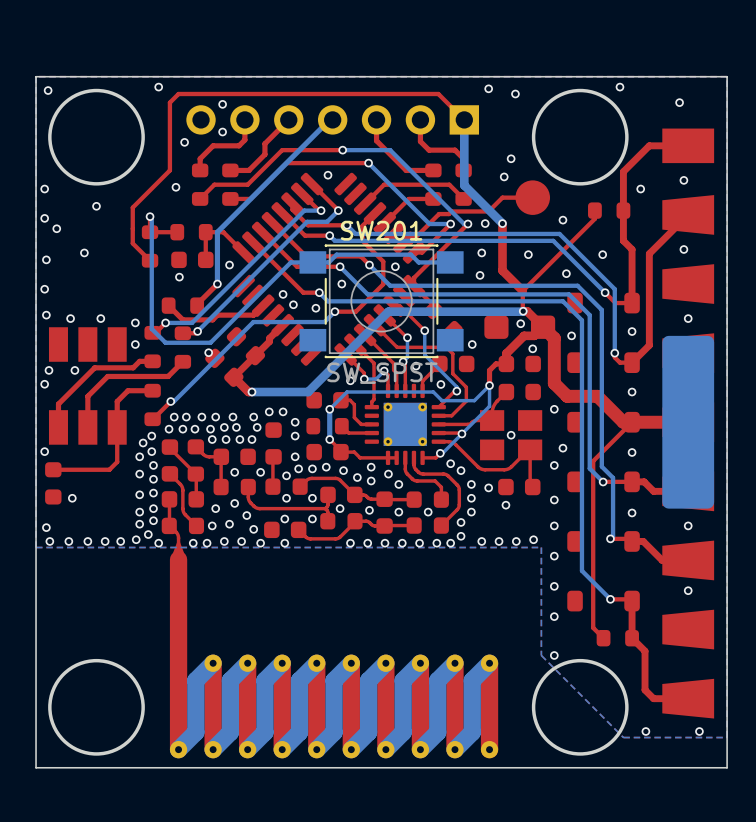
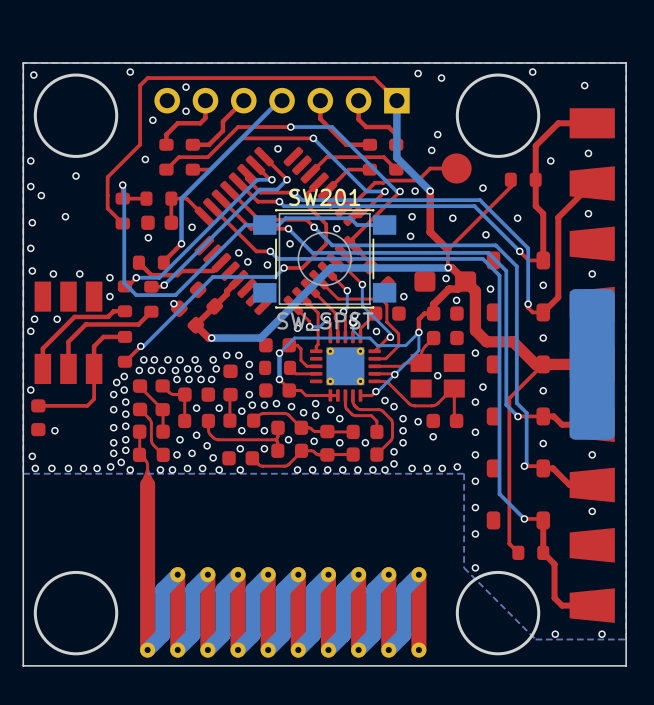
bottom track: none -> (353, 322) (353, 330) (360, 338)
via: none -> (353, 322)

